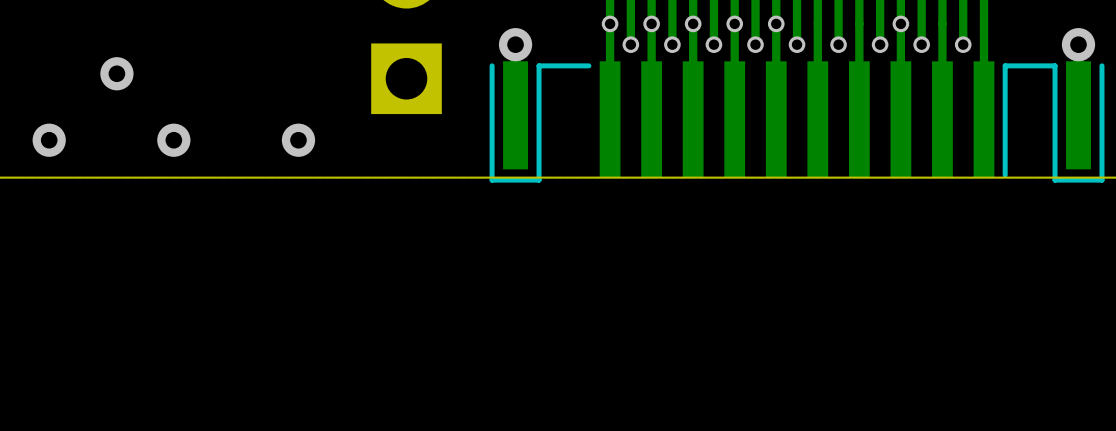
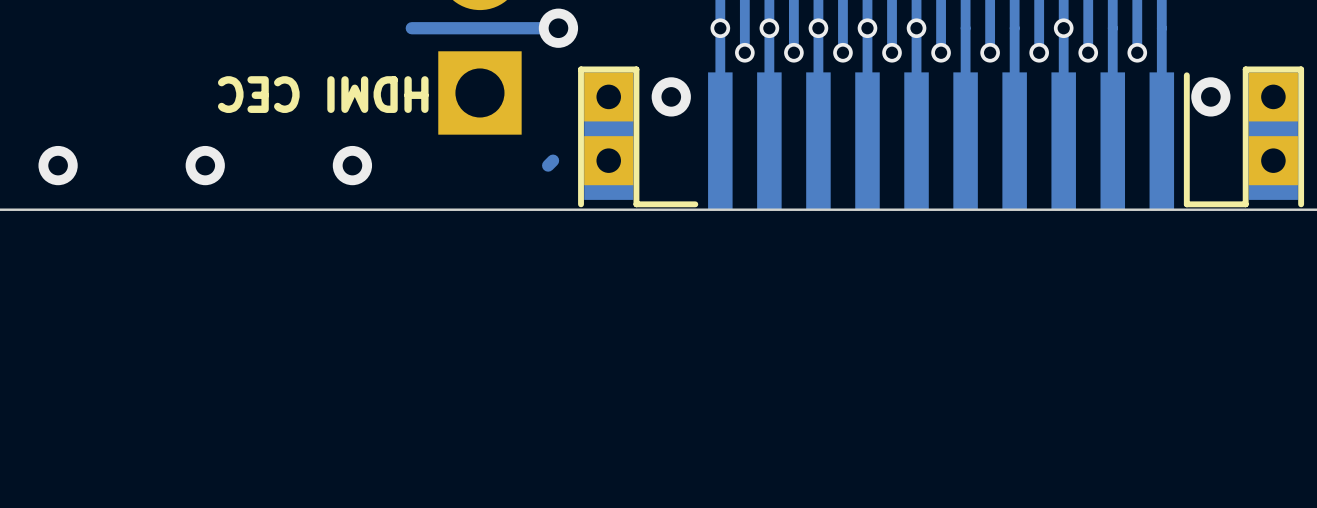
track: none -> (411, 28) (558, 28) (553, 33)
via: none -> (558, 28)
via: (515, 44) -> none
via position: (1078, 44) -> (1210, 96)
part footprint: [489, 61, 1105, 183] -> [578, 66, 1305, 210]
via: (116, 73) -> none
text: none -> HDMI CEC (323, 94)
via: none -> (671, 96)
track: none -> (553, 160) (548, 165)

